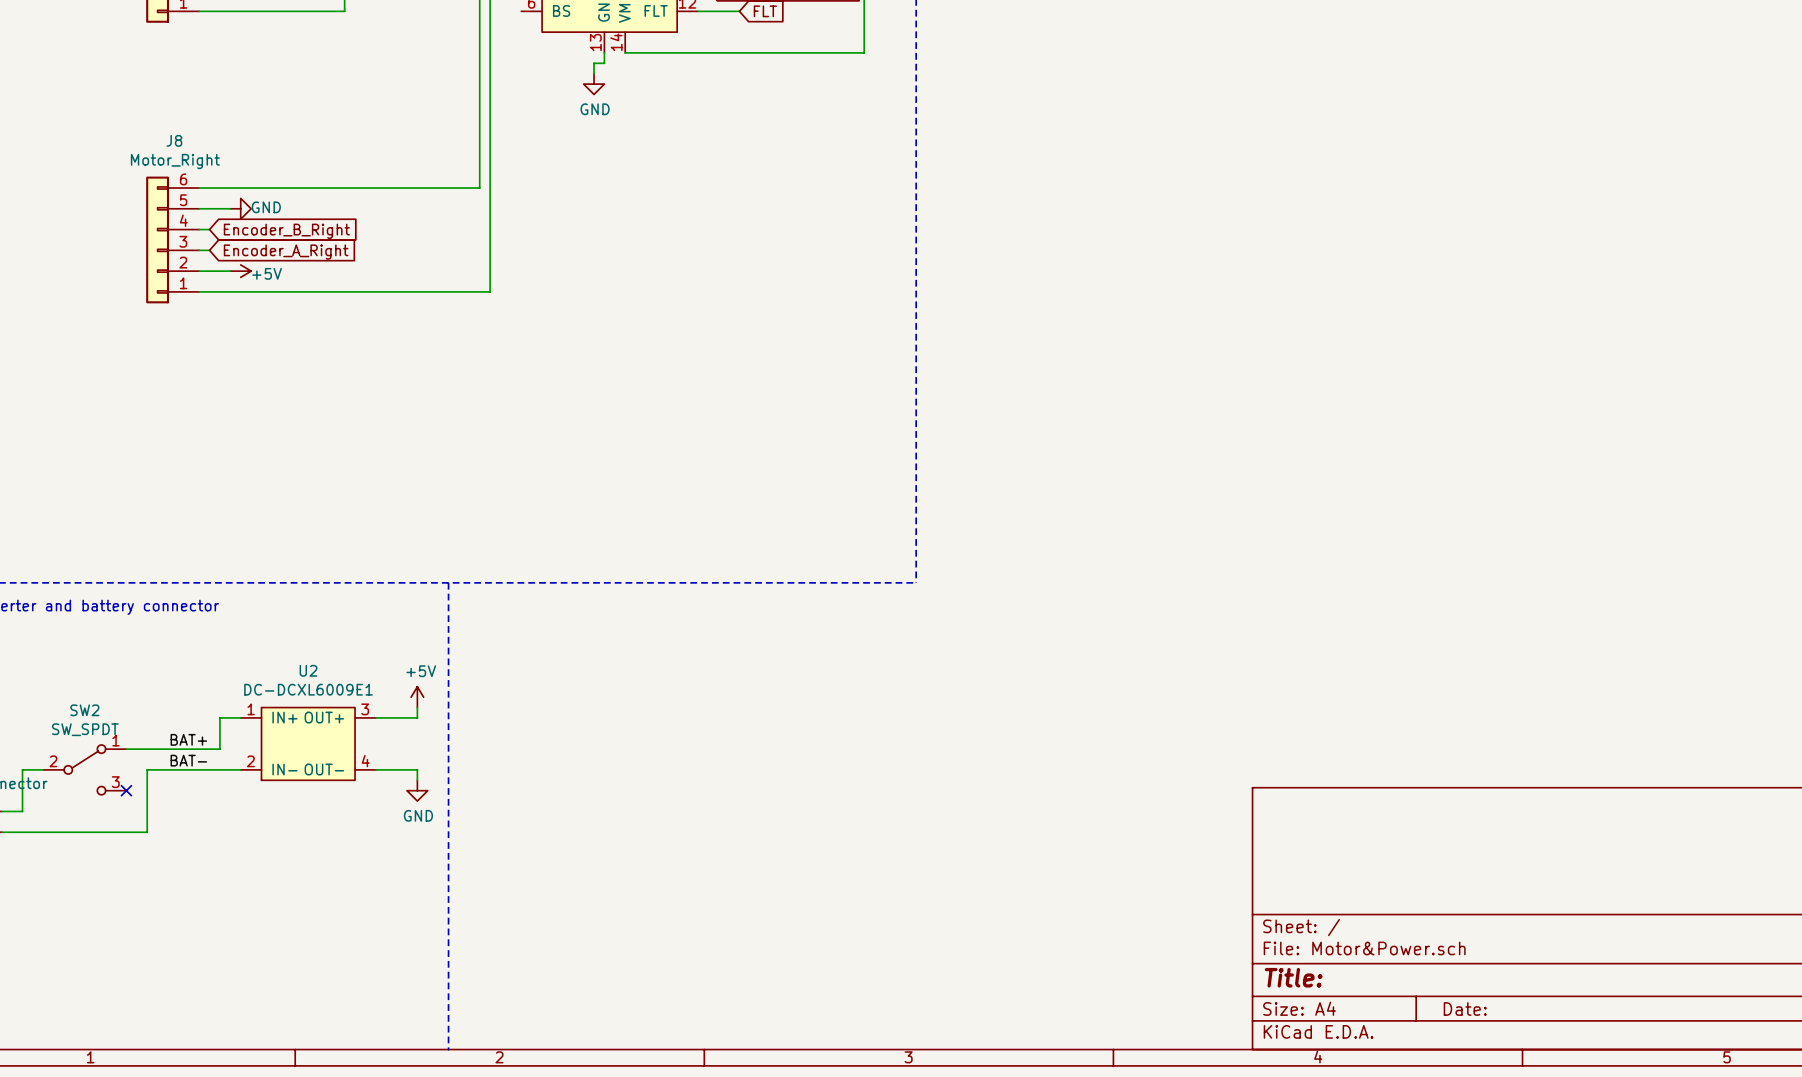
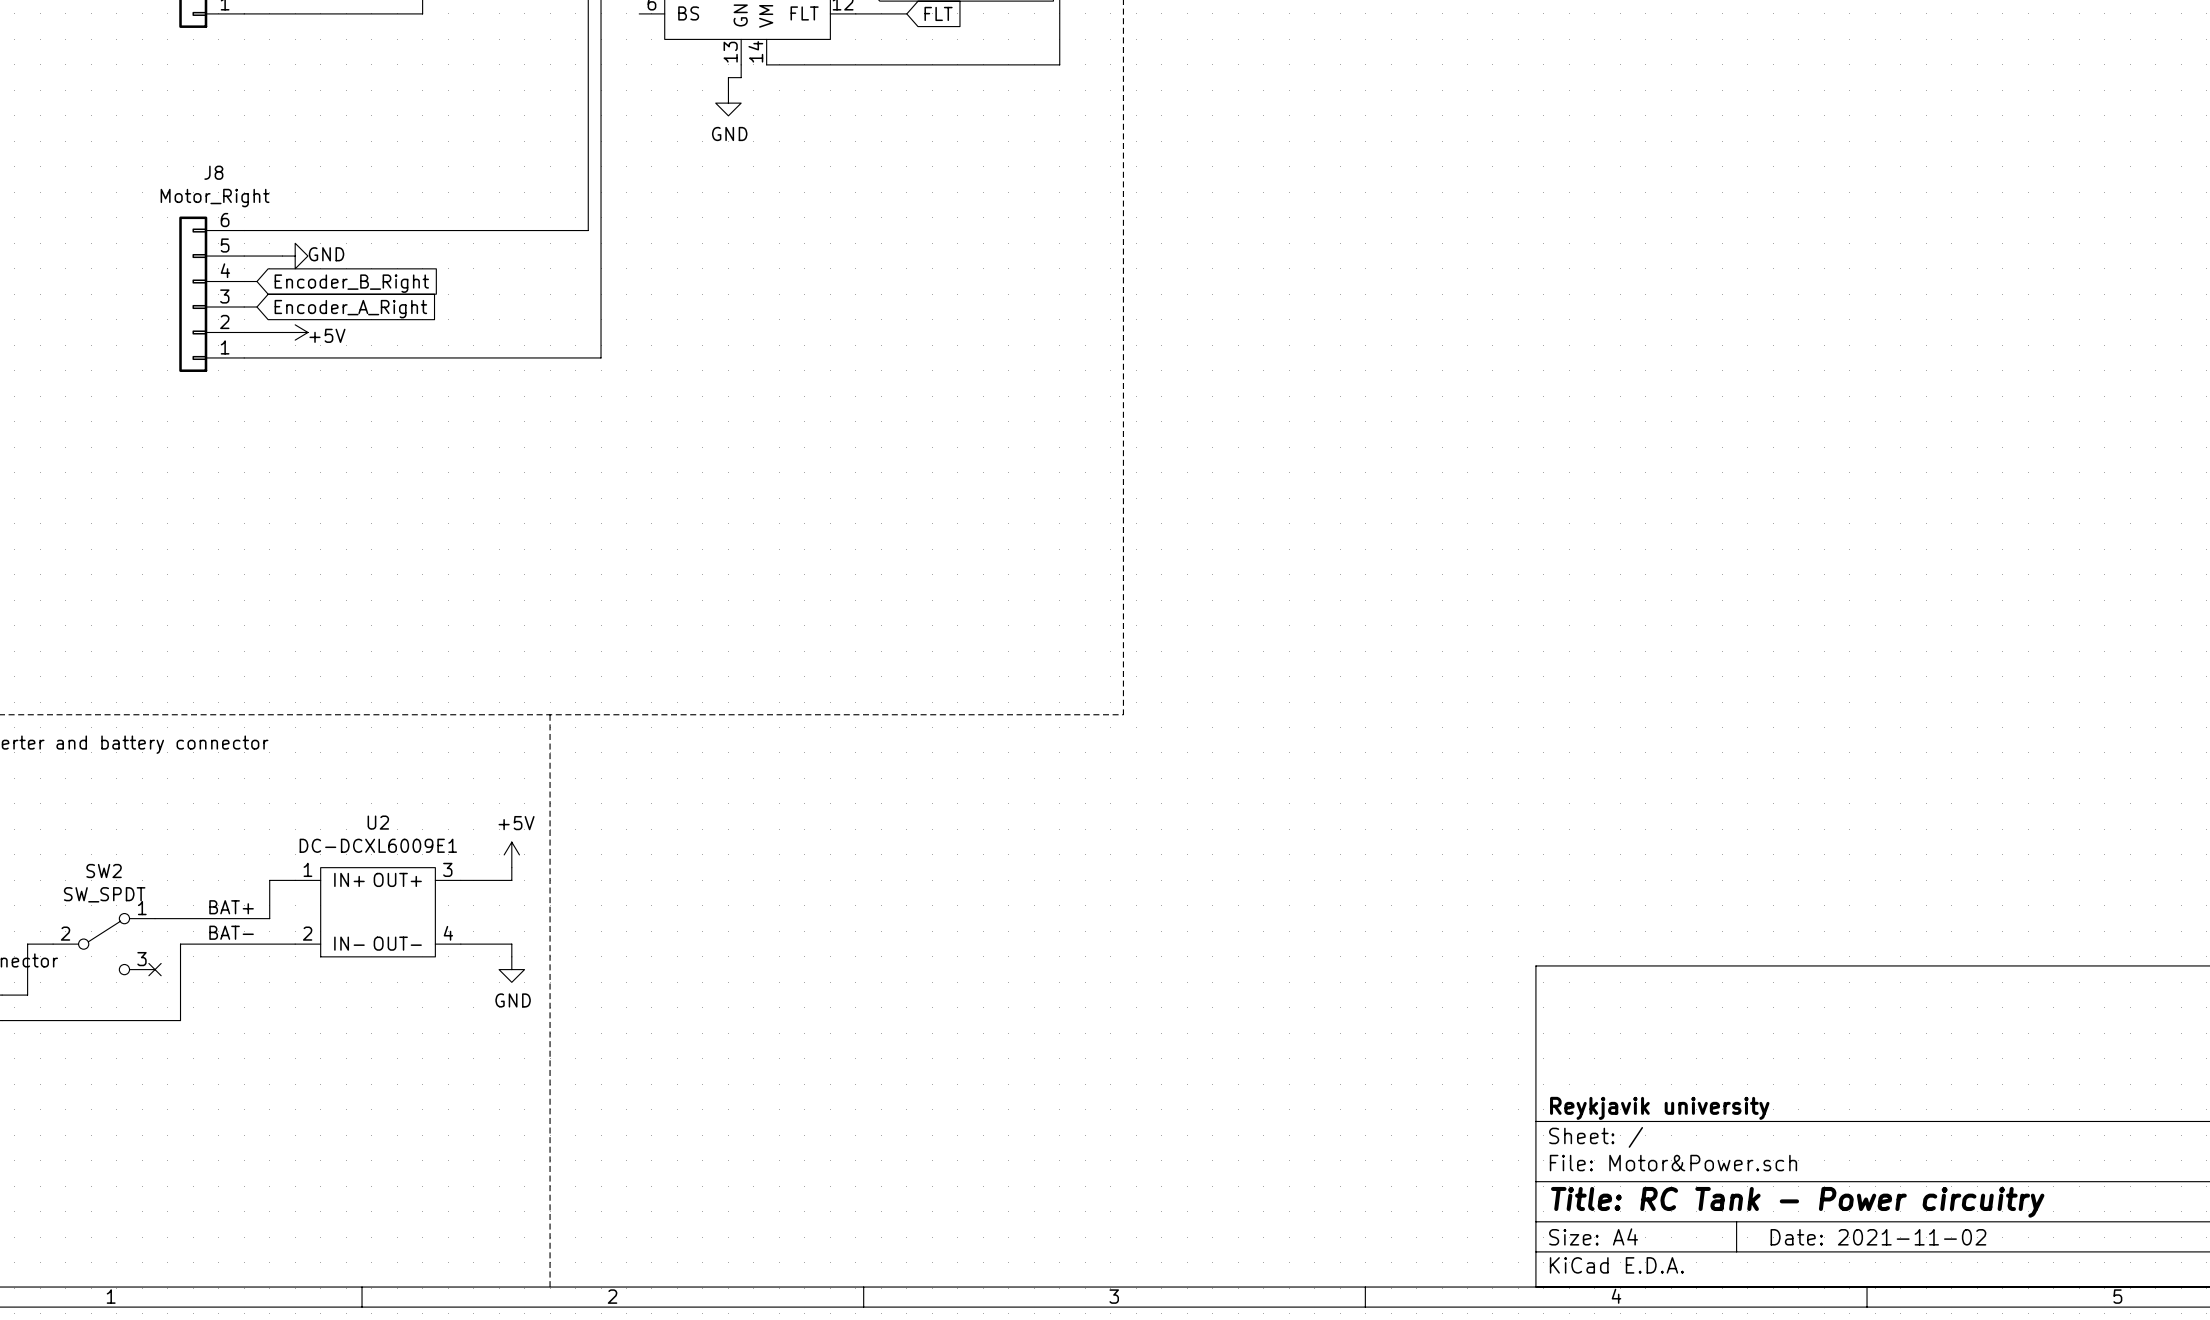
title block: none -> Reykjavik university (1659, 1108)
title block: Title: (1293, 977) -> Title: RC Tank - Power circuitry (1797, 1202)
title block: Date: (1465, 1009) -> Date: 2021-11-02 (1878, 1237)

